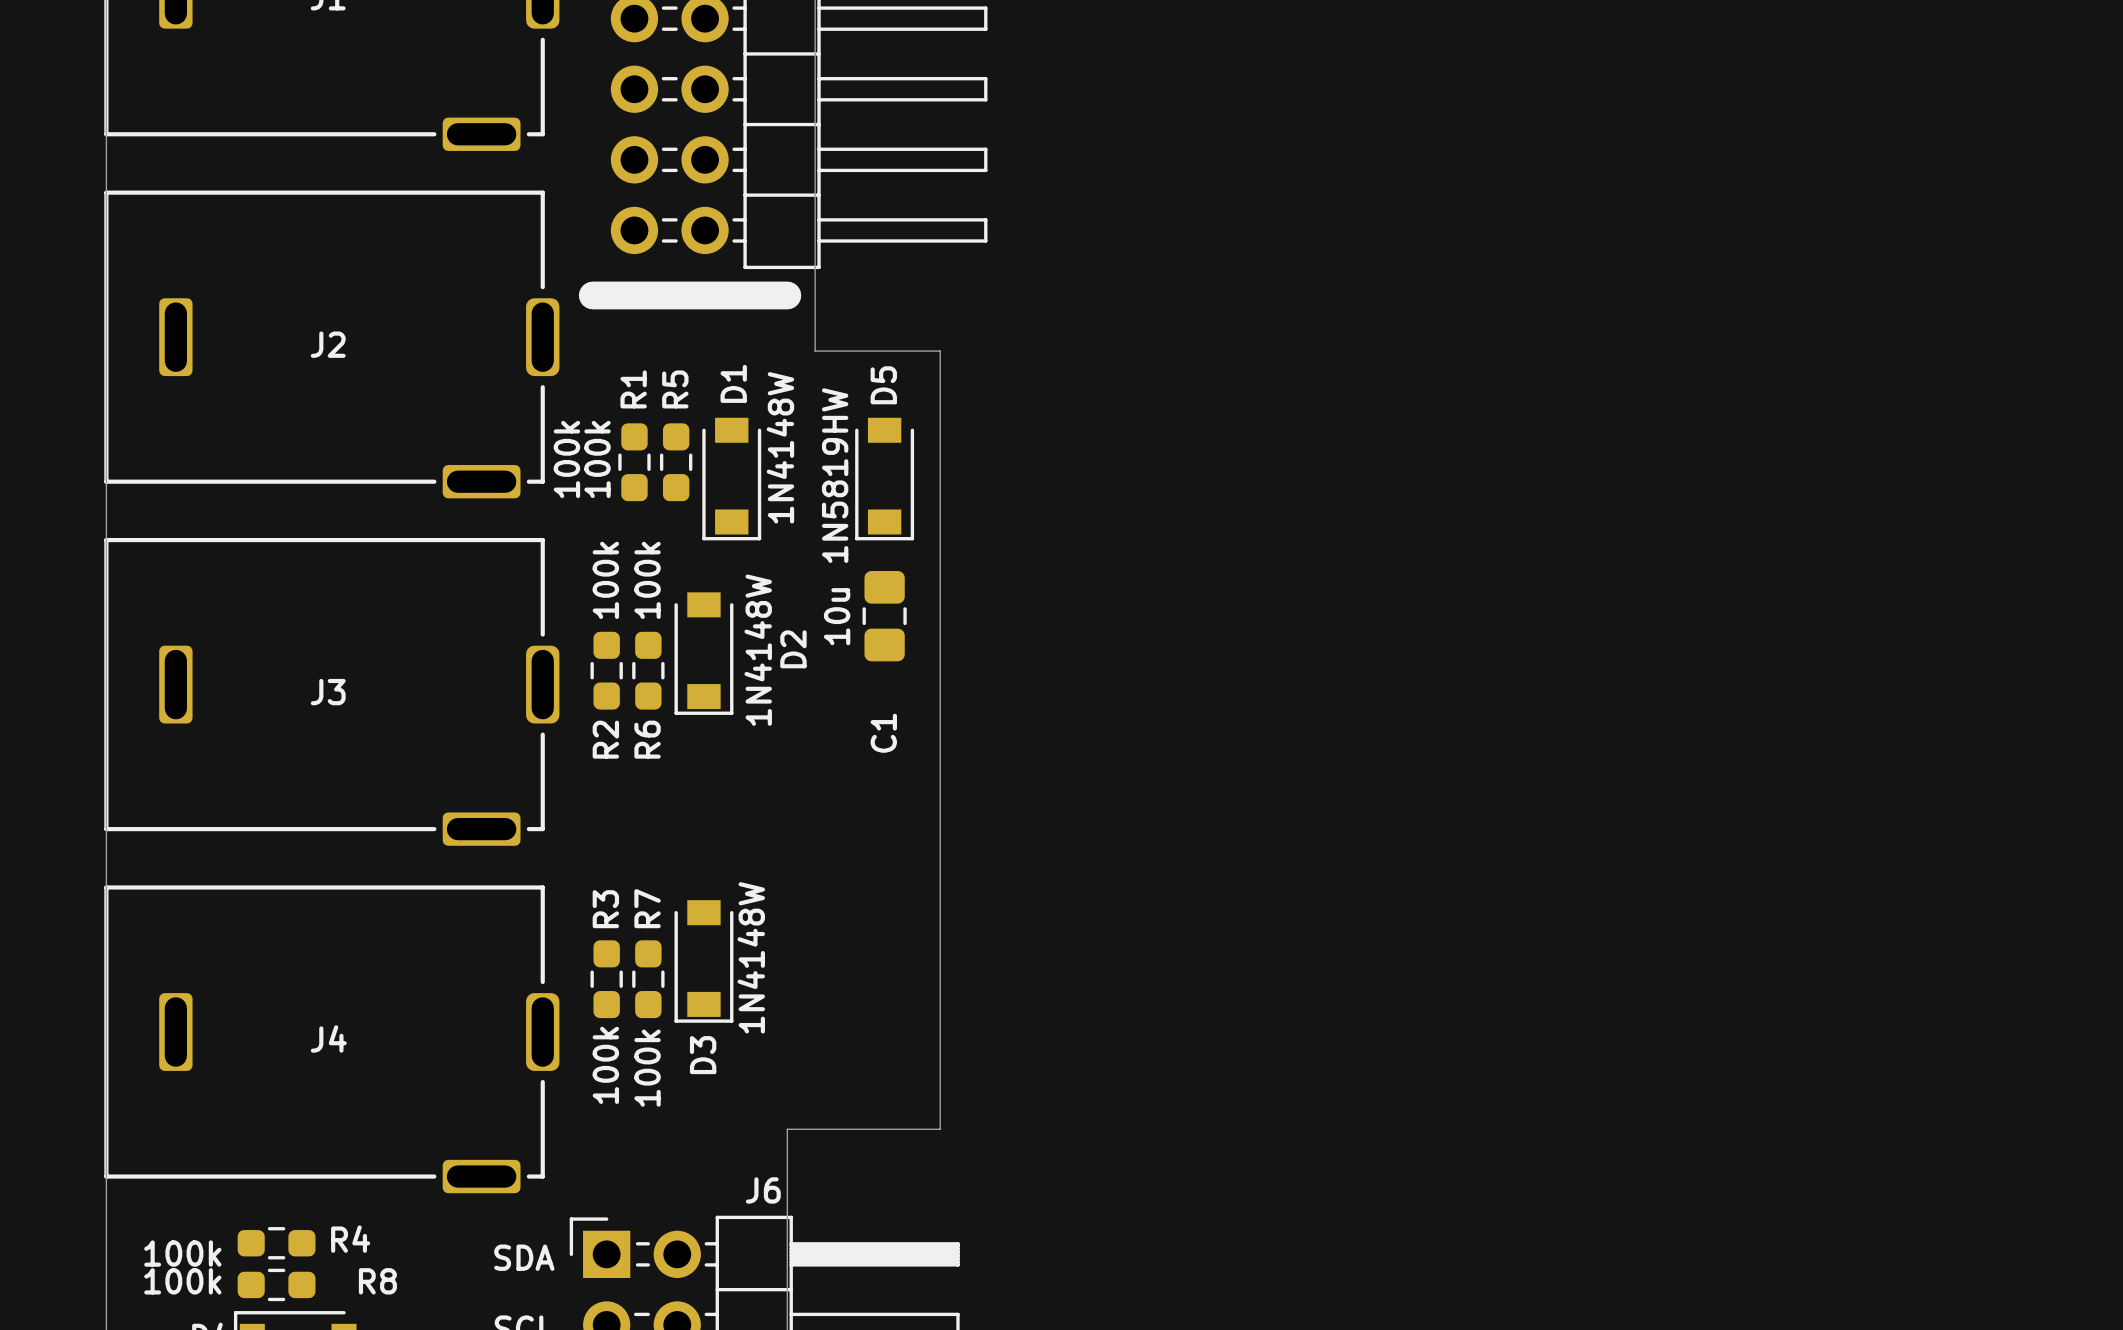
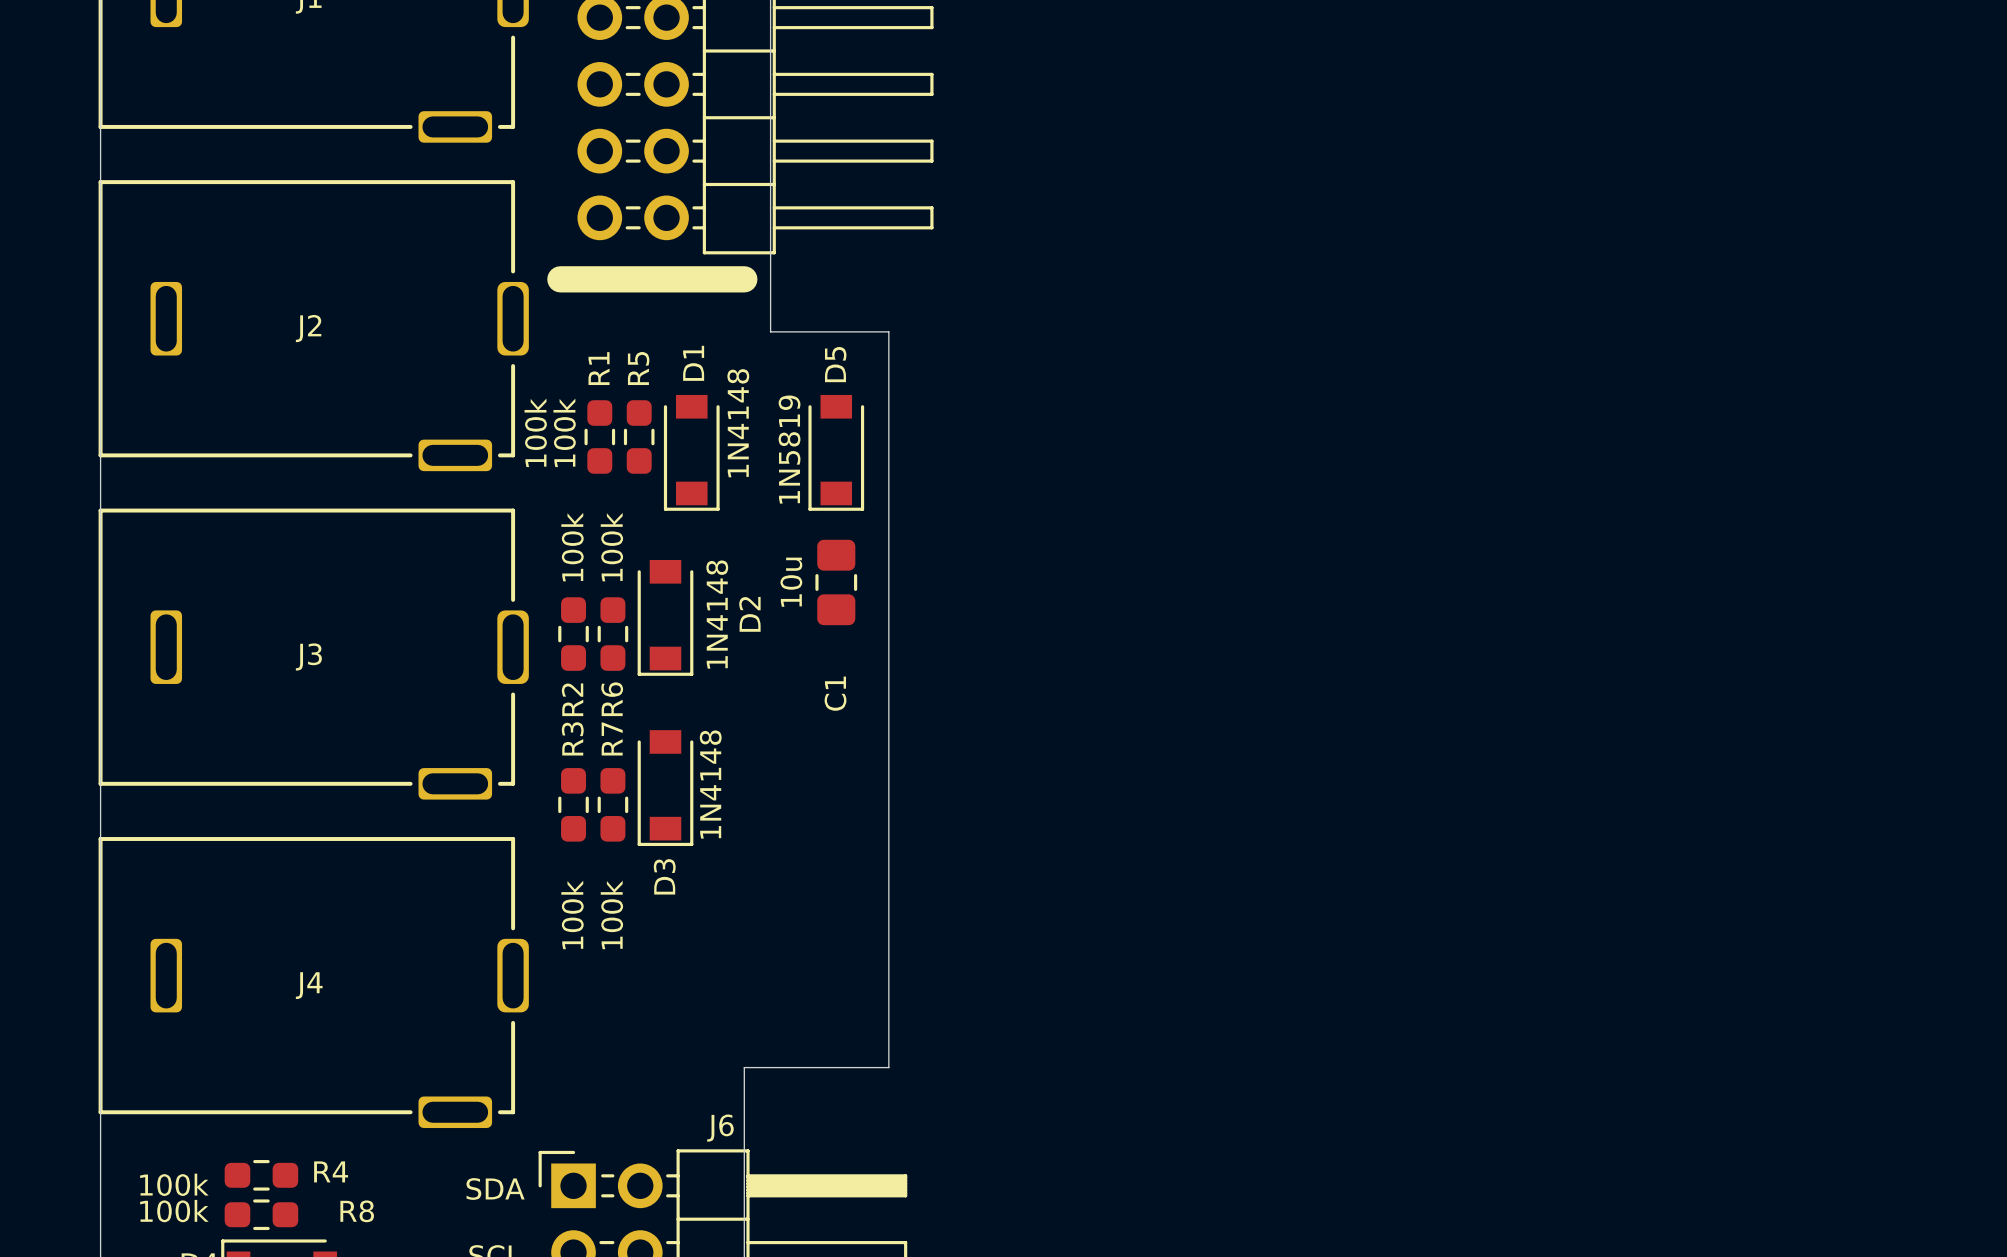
D1 value: 1N4148W (780, 447) -> 1N4148 (738, 423)
D5 value: 1N5819HW (835, 475) -> 1N5819 (789, 449)
D2 value: 1N4148W (758, 650) -> 1N4148 (717, 614)
D3 value: 1N4148W (751, 957) -> 1N4148 (710, 784)
D3 position: (703, 961) -> (665, 788)
R3 position: (606, 979) -> (573, 804)
R7 position: (648, 979) -> (612, 804)
R3 value position: 100k (605, 1065) -> 100k (572, 914)
R7 value position: 100k (647, 1068) -> 100k (611, 914)

